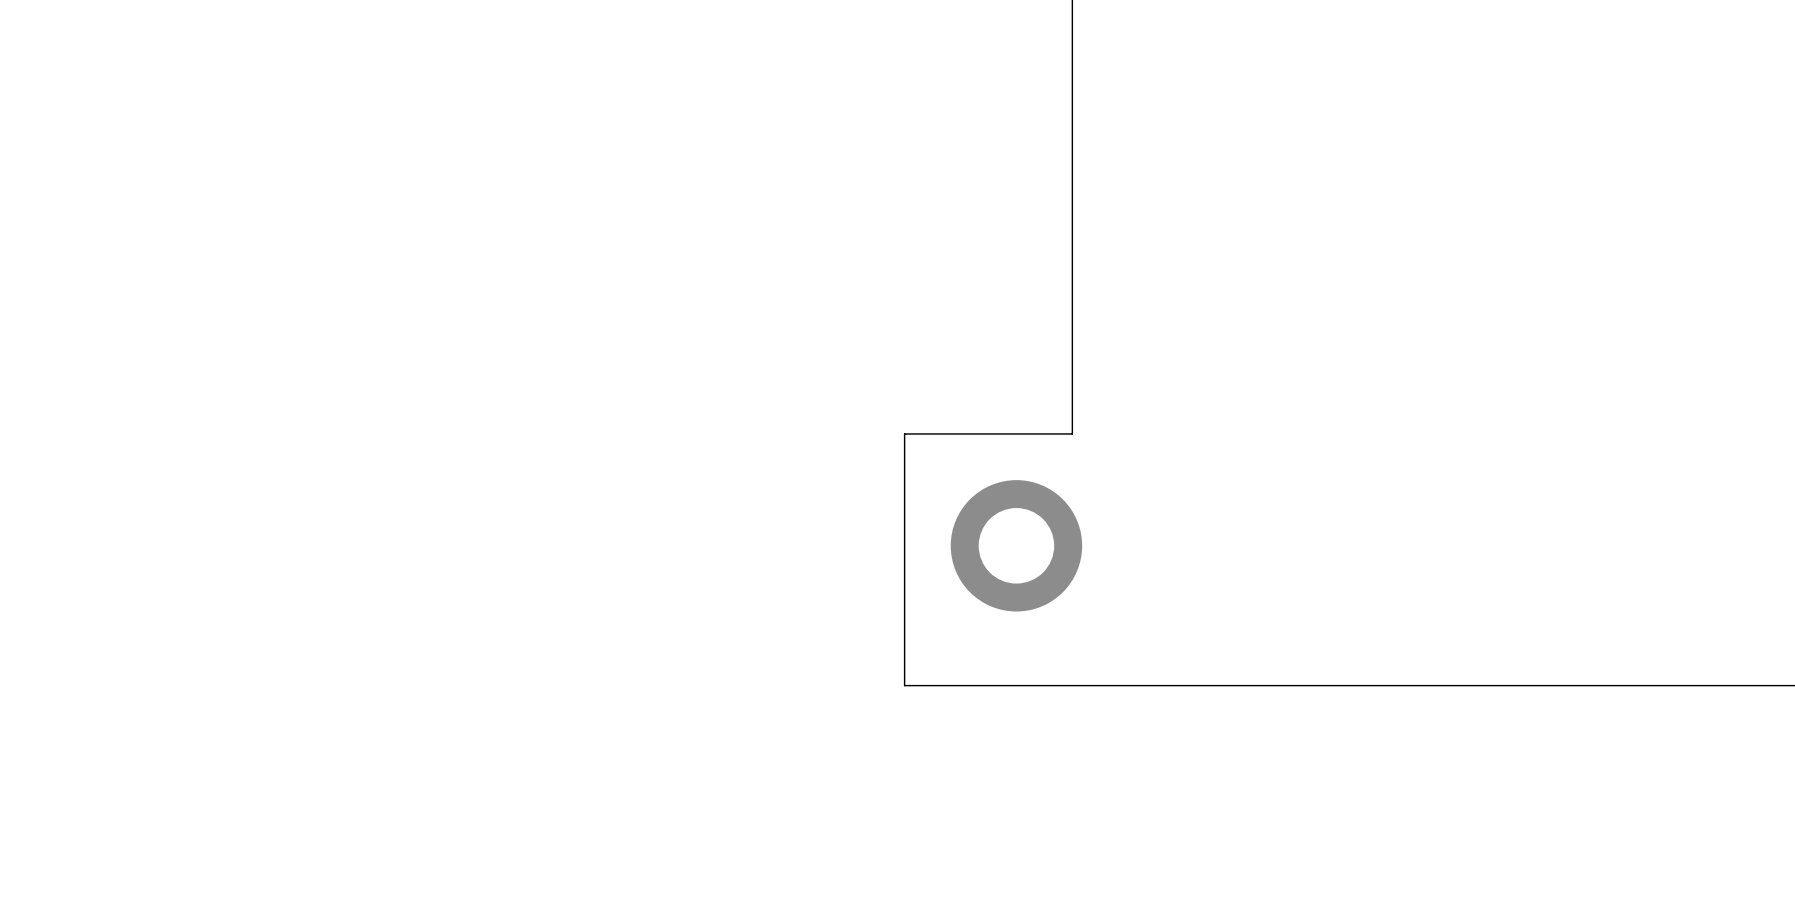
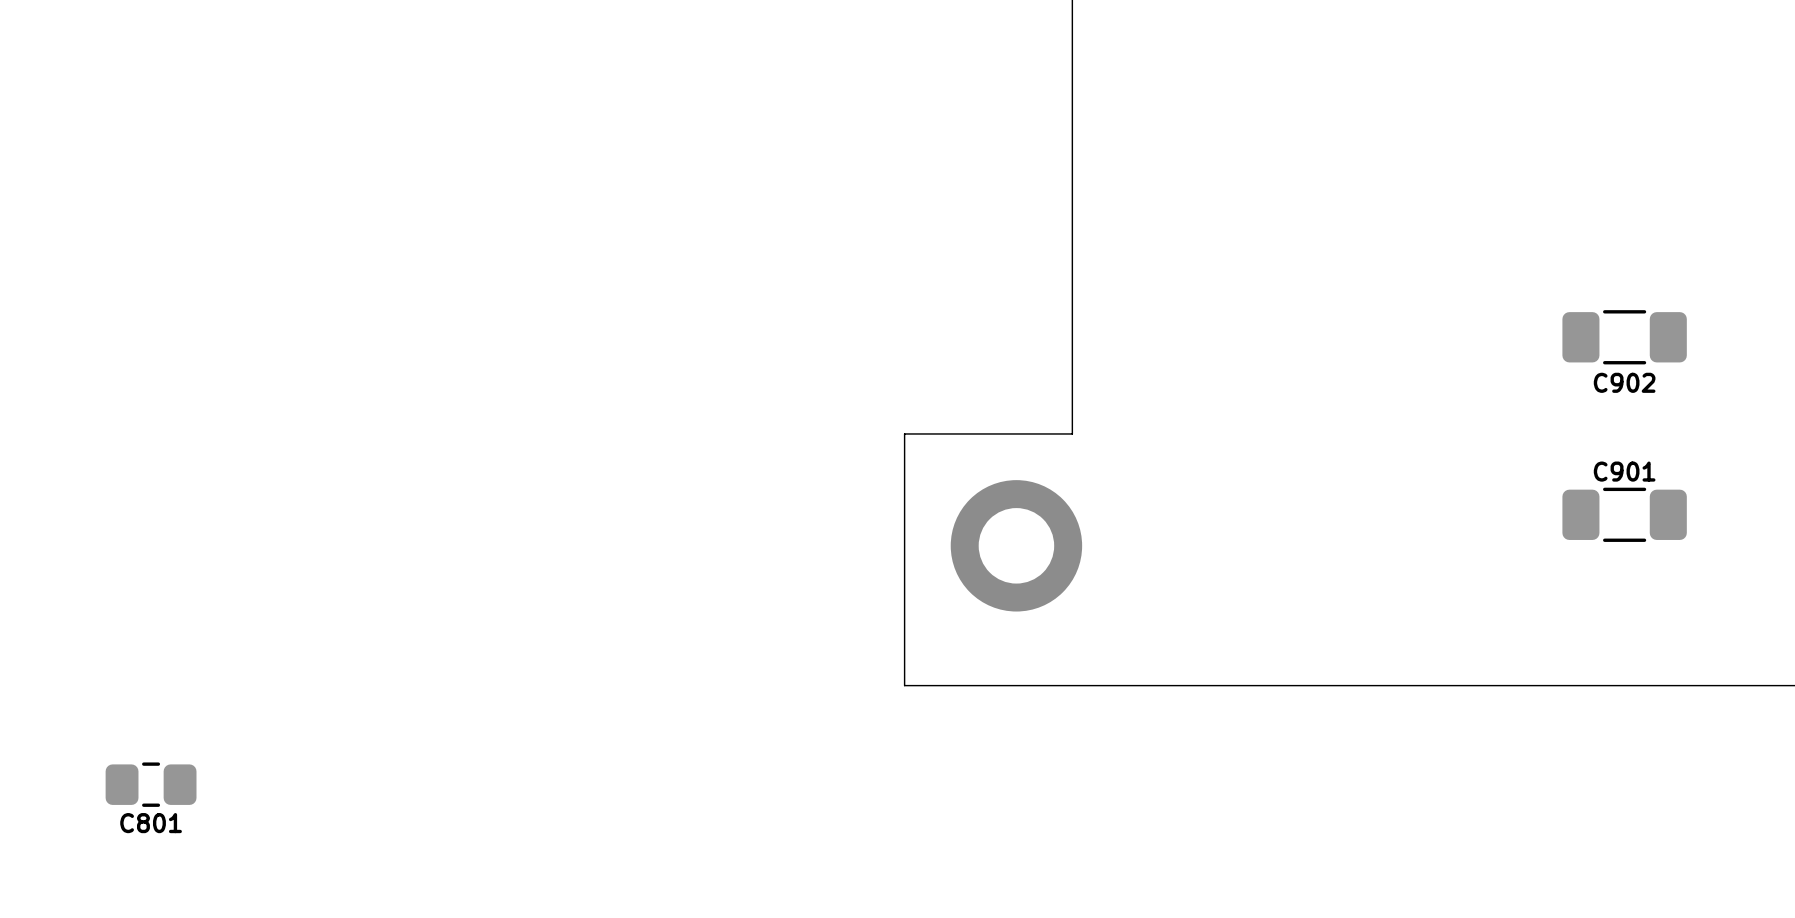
C902: none -> (1624, 337)
C901: none -> (1624, 514)
C801: none -> (151, 784)

